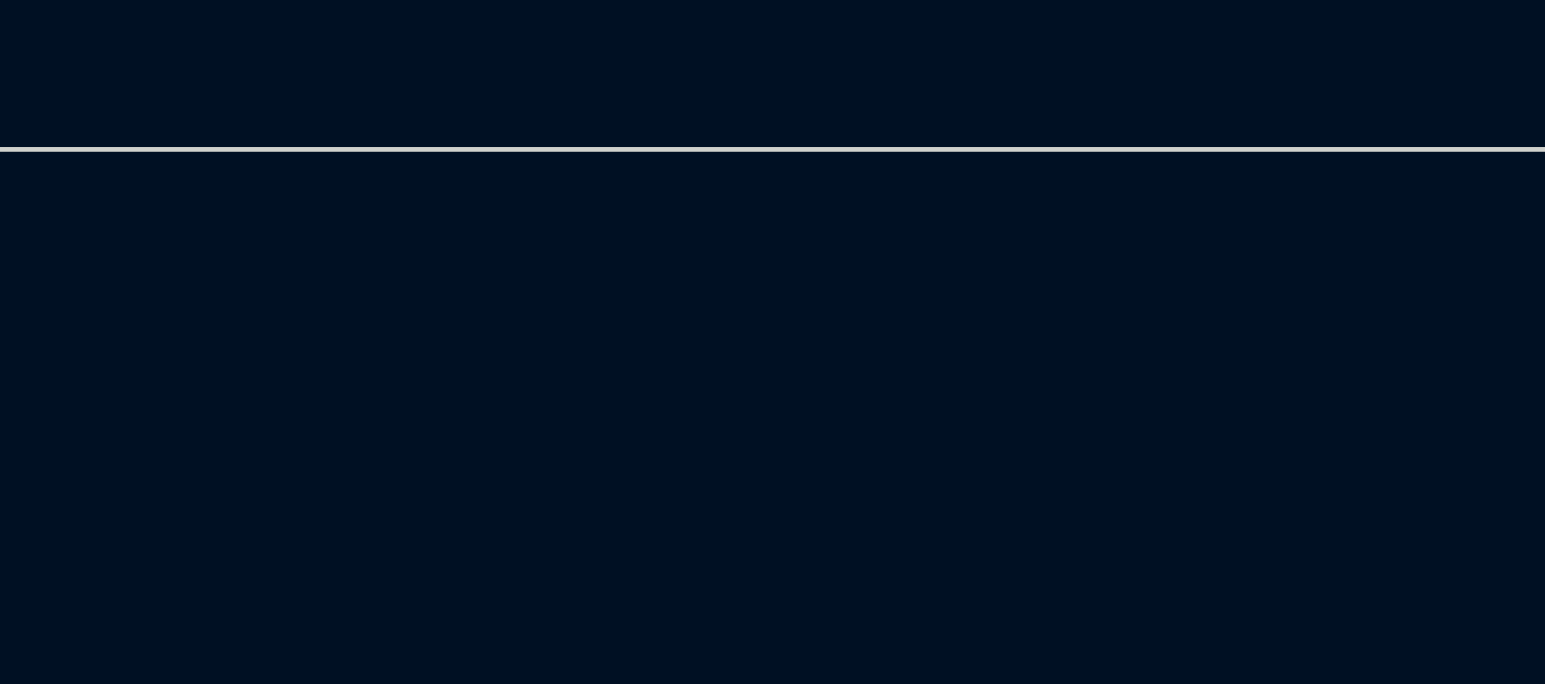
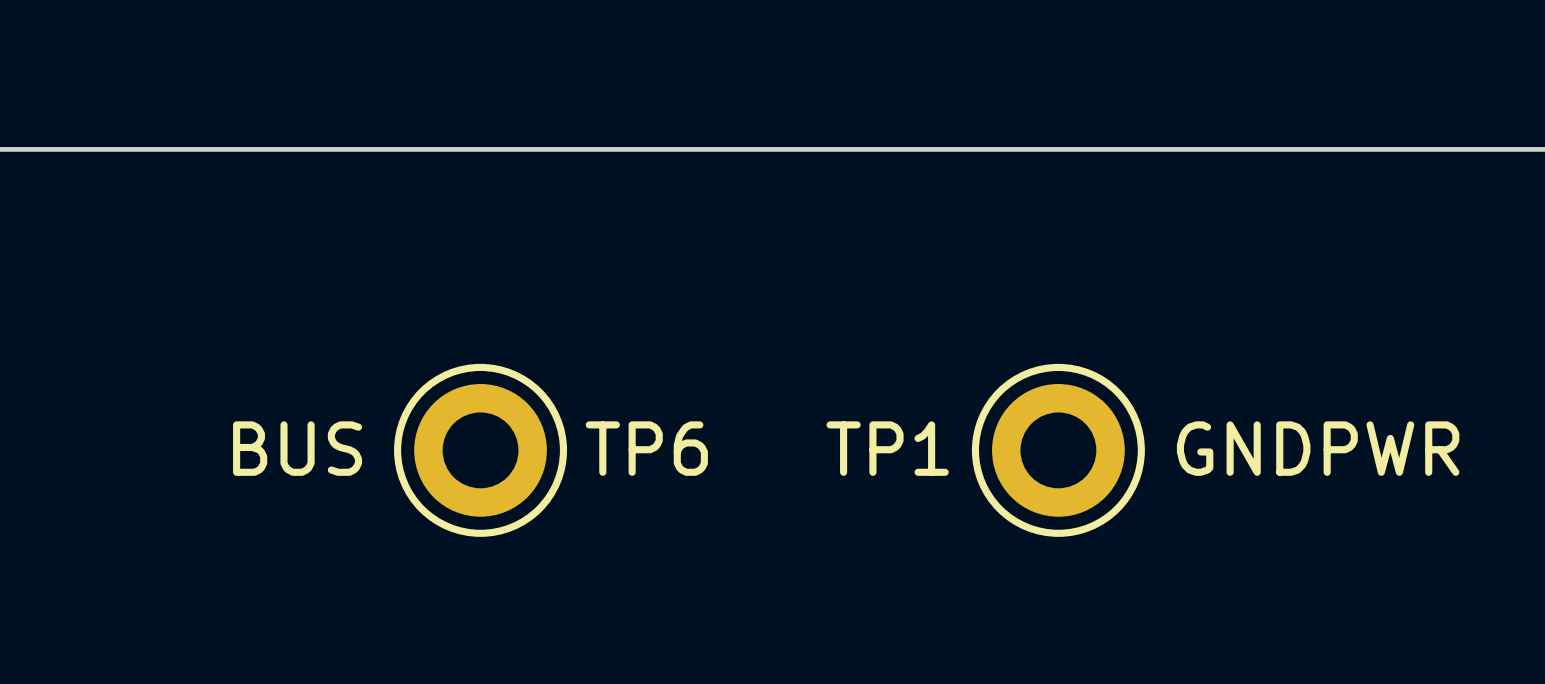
text: none -> BUS (297, 448)
text: none -> GNDPWR (1318, 448)
TP6: none -> (480, 450)
TP1: none -> (1058, 450)

